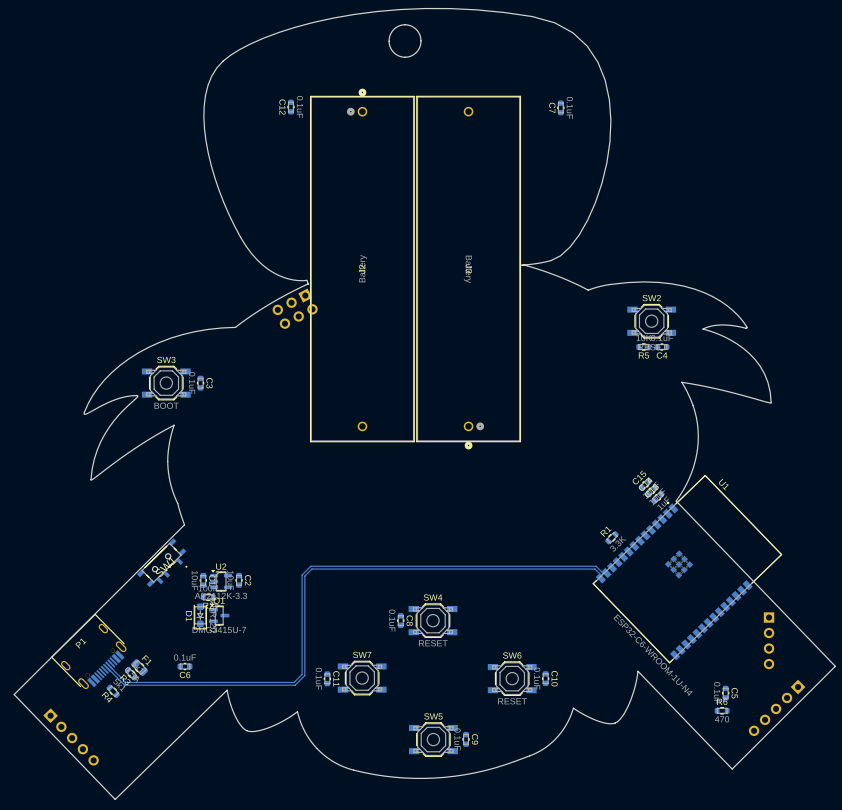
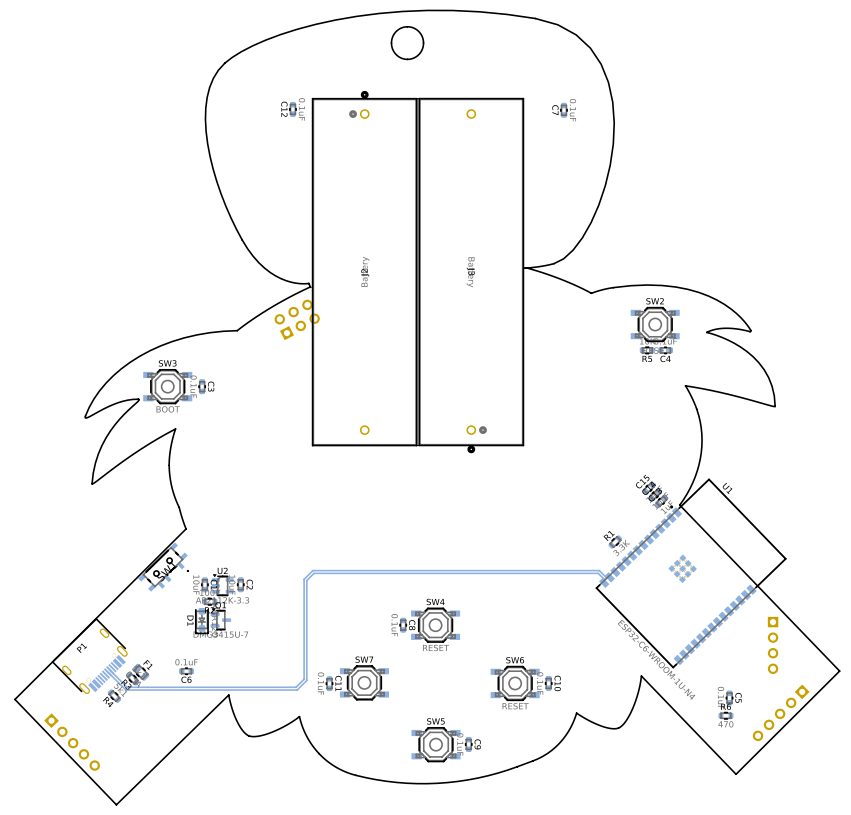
part rotation: 0° (295, 308) -> 180° (297, 319)

